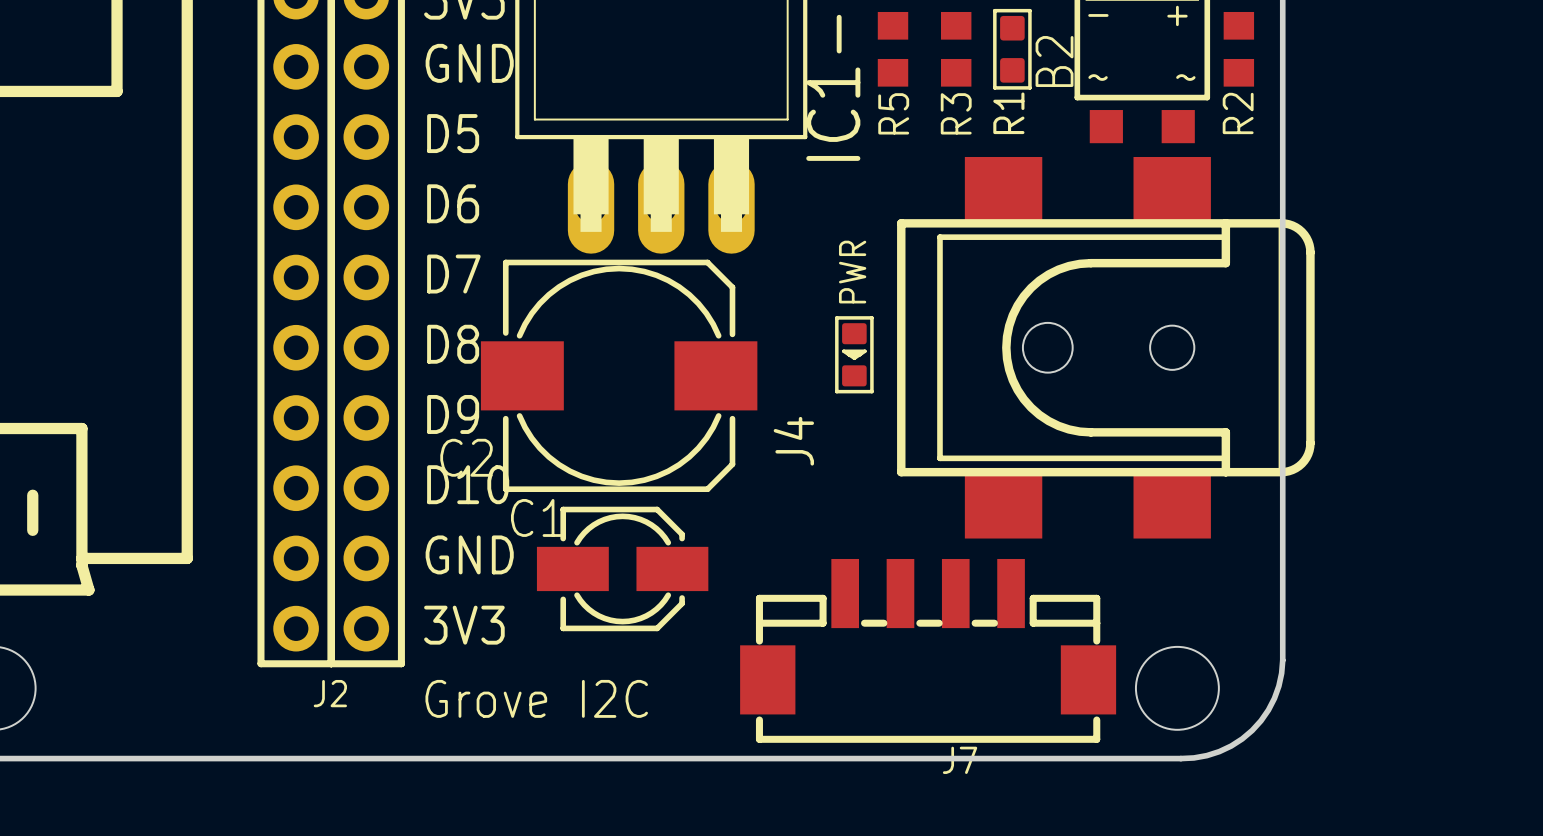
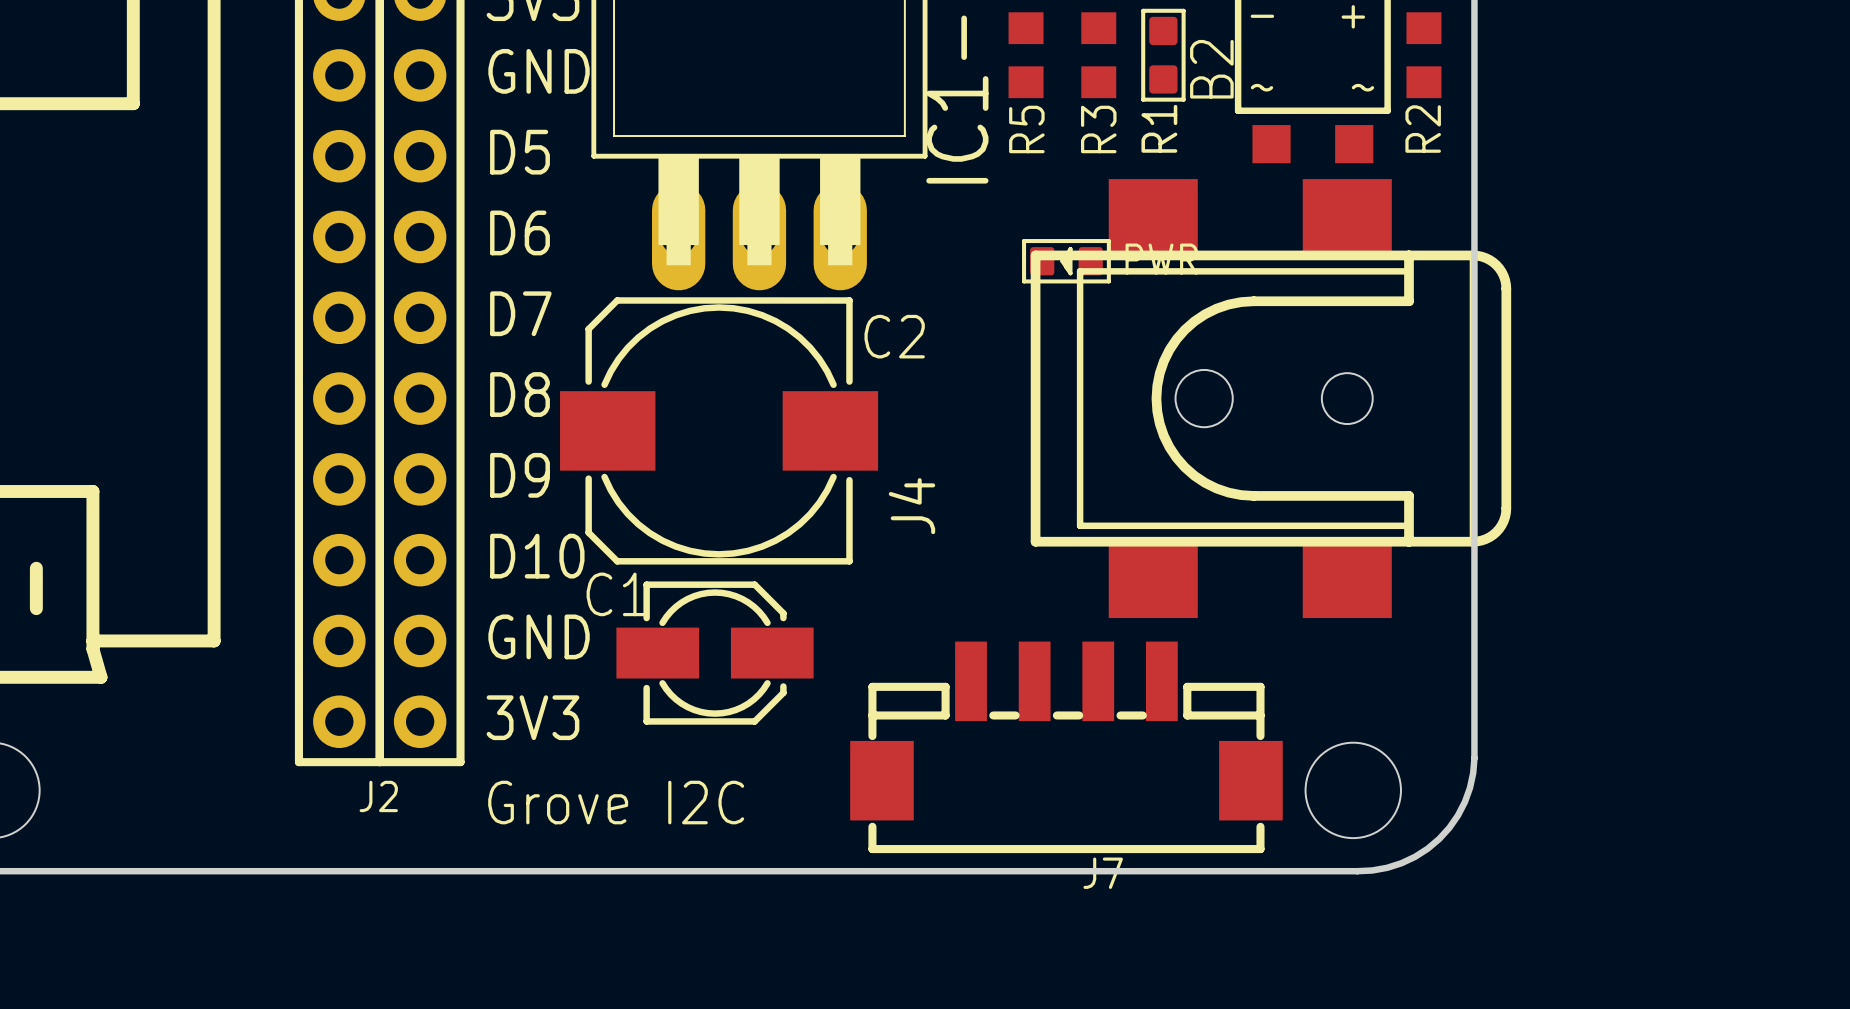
PWR rotation: 0° (854, 354) -> 90° clockwise (1066, 261)
PWR position: (854, 354) -> (1066, 261)
C2 rotation: 0° (619, 375) -> 180° (719, 430)

